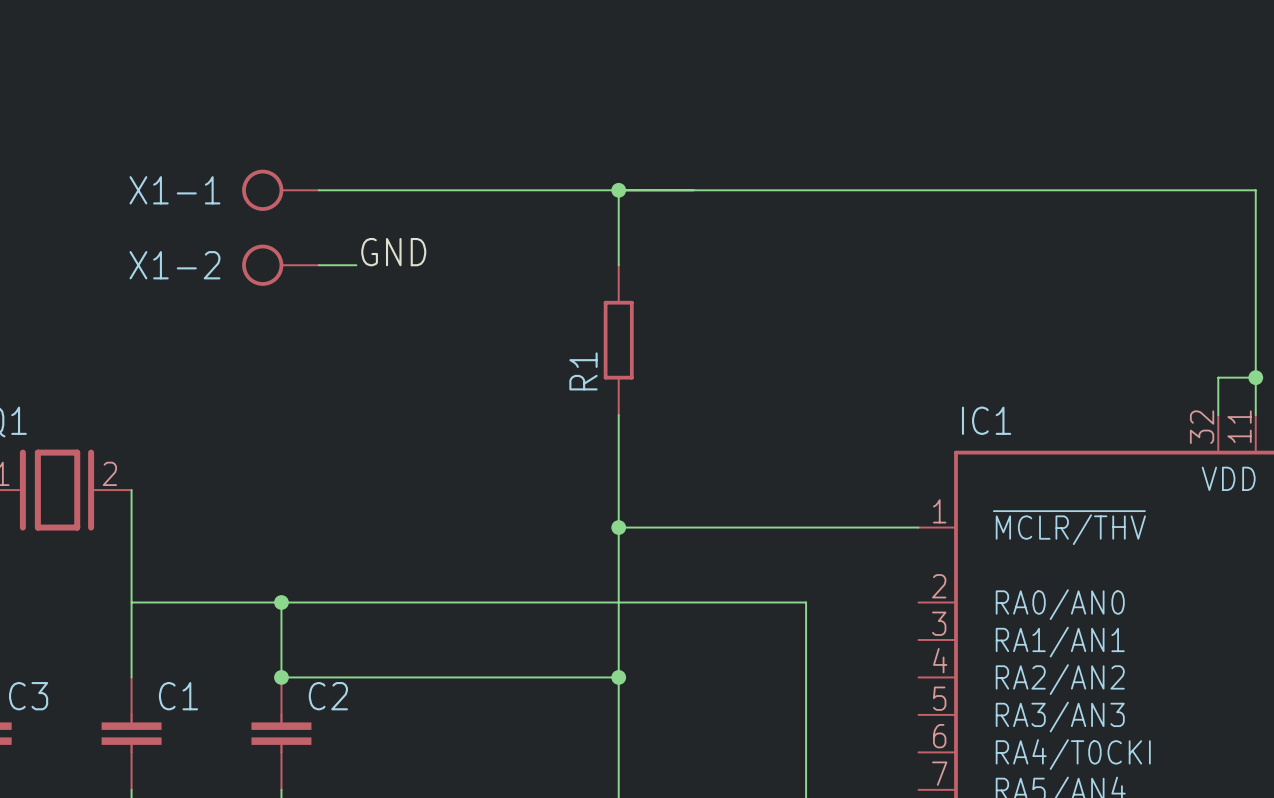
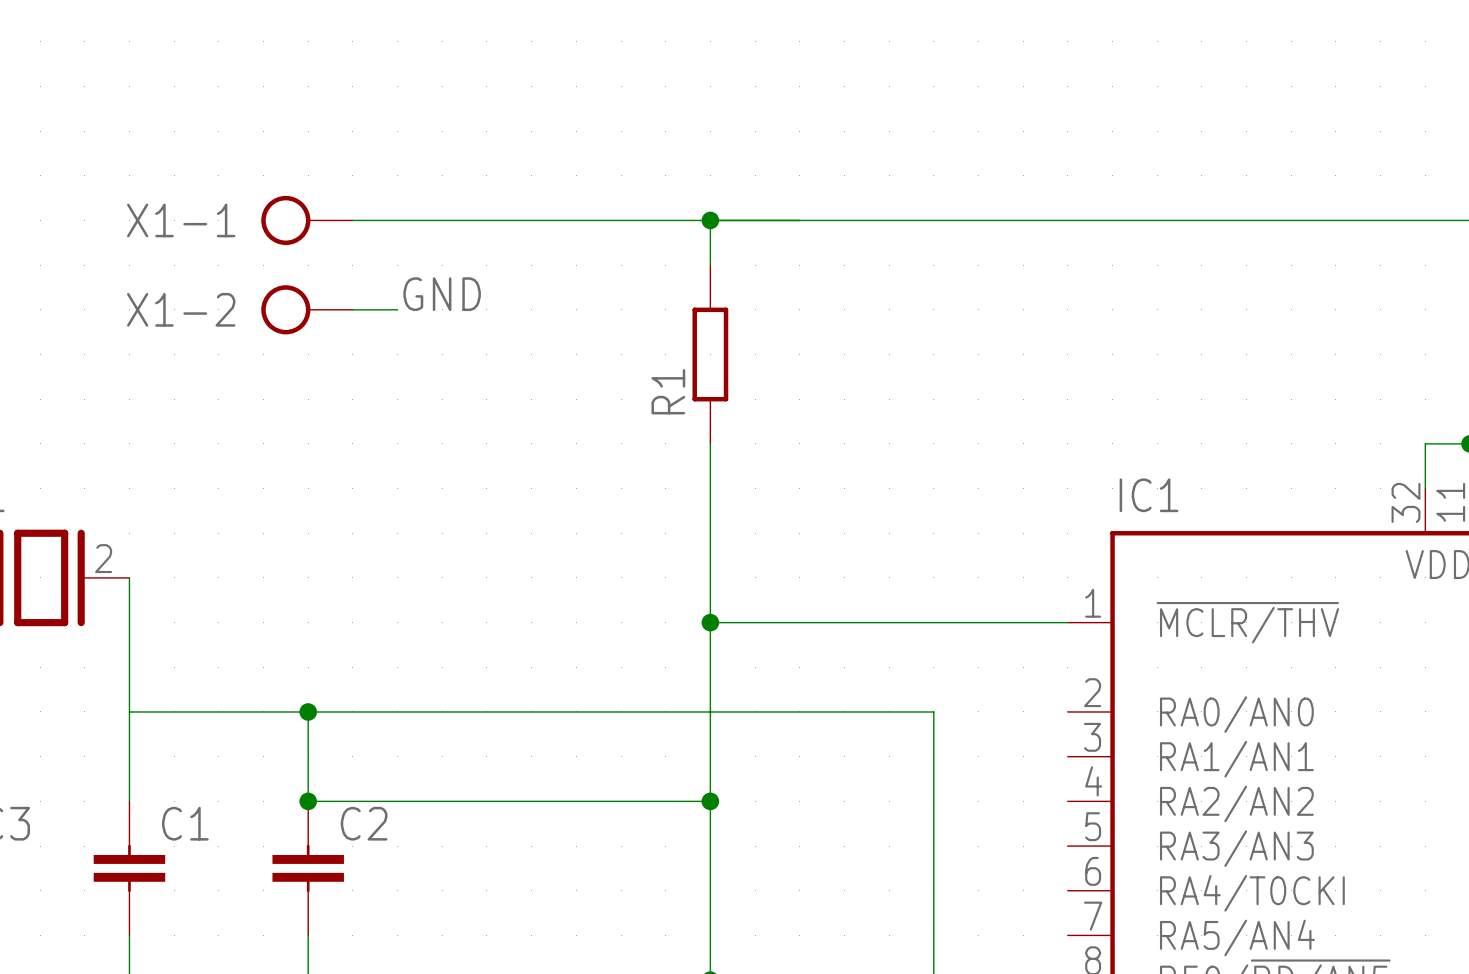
R1 position: (618, 340) -> (710, 354)

